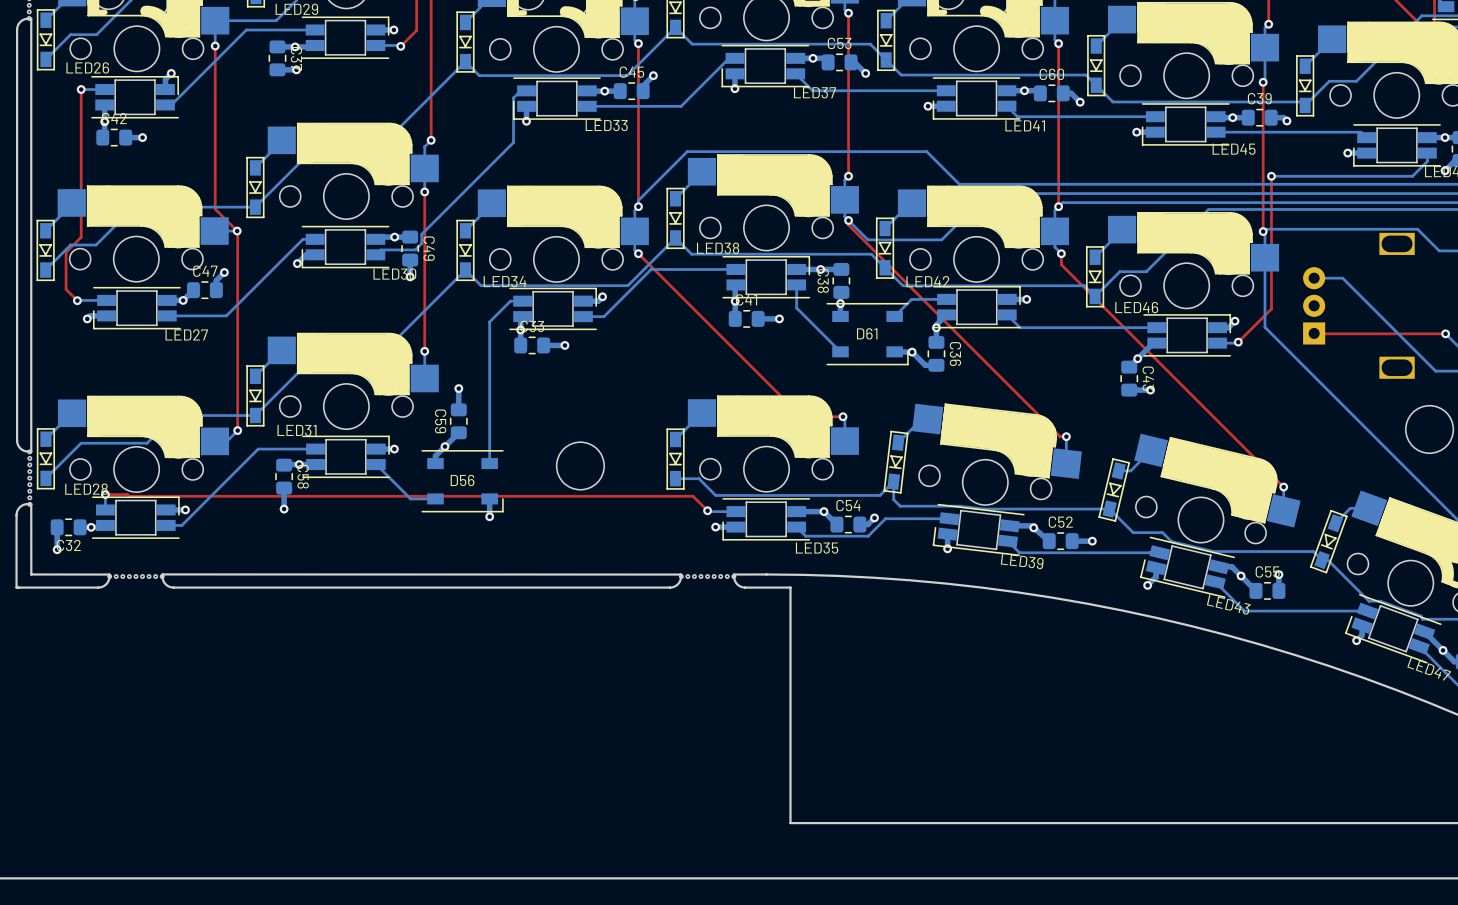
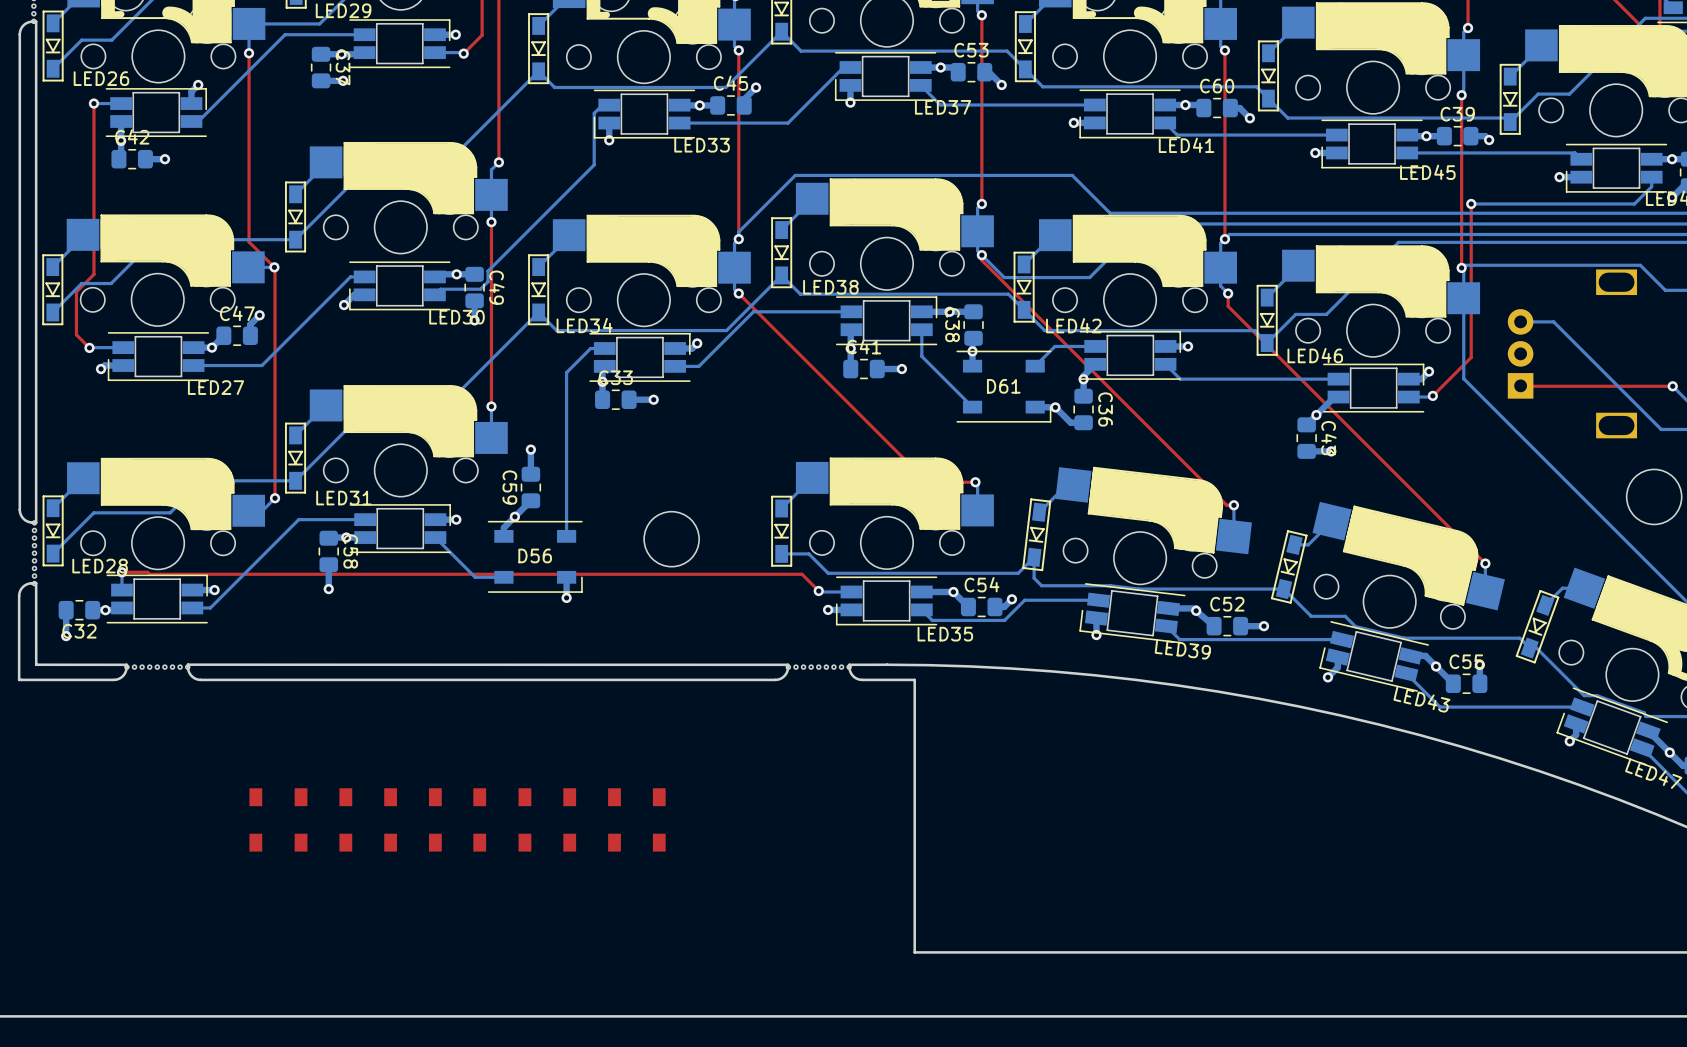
part: none -> (255, 819)
part: none -> (301, 819)
part: none -> (345, 819)
part: none -> (390, 819)
part: none -> (435, 819)
part: none -> (479, 819)
part: none -> (524, 819)
part: none -> (569, 819)
part: none -> (614, 819)
part: none -> (659, 819)

